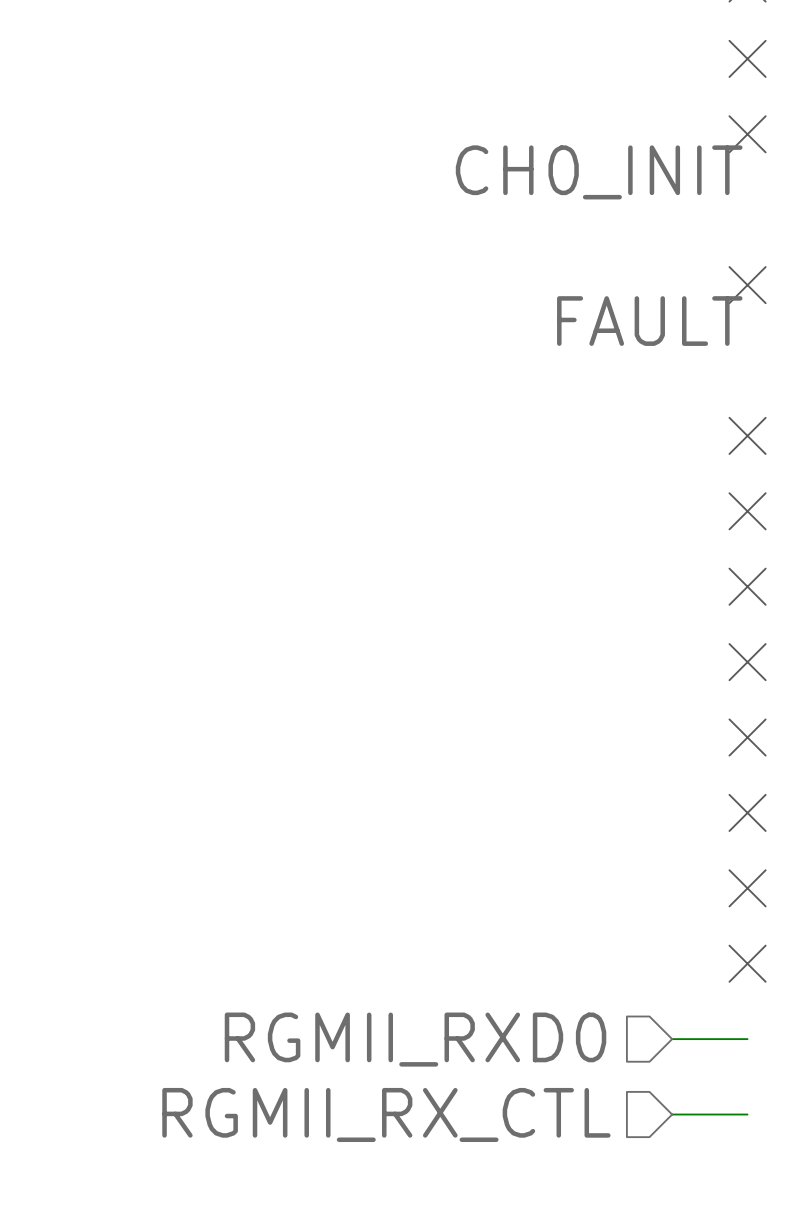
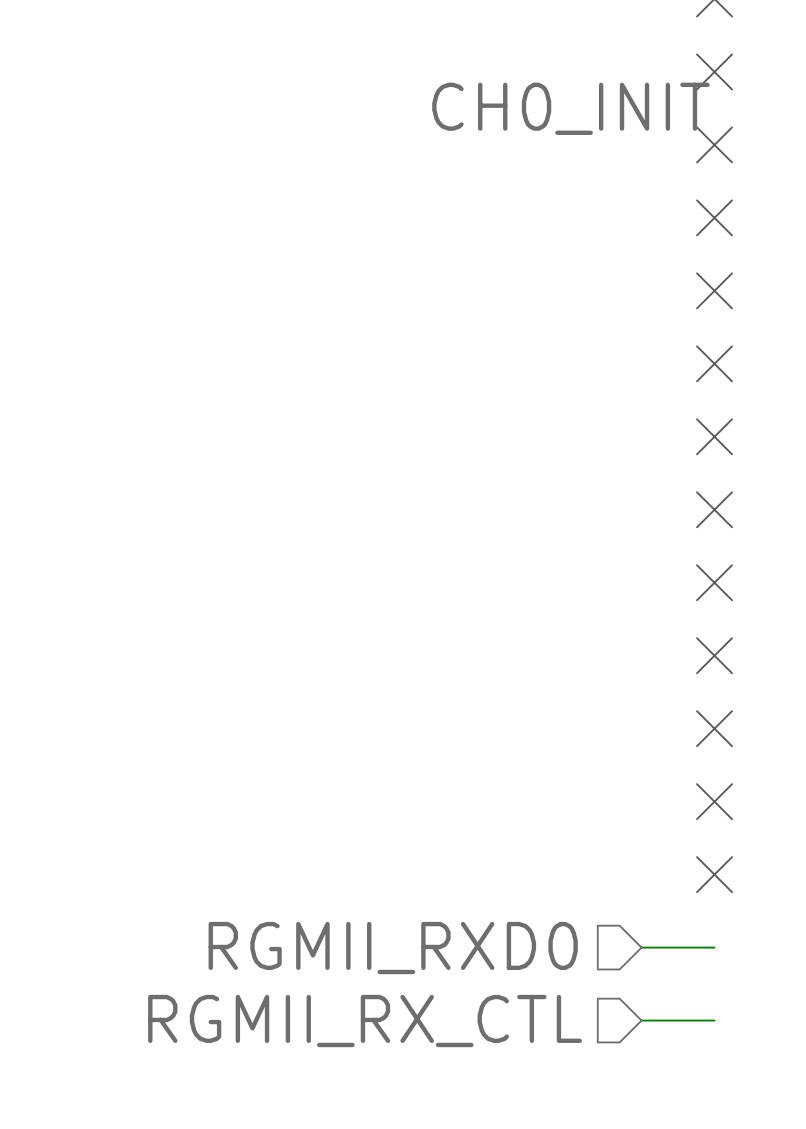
no-connect mark: none -> (714, 144)
label: FAULT (649, 321) -> none
no-connect mark: none -> (714, 290)

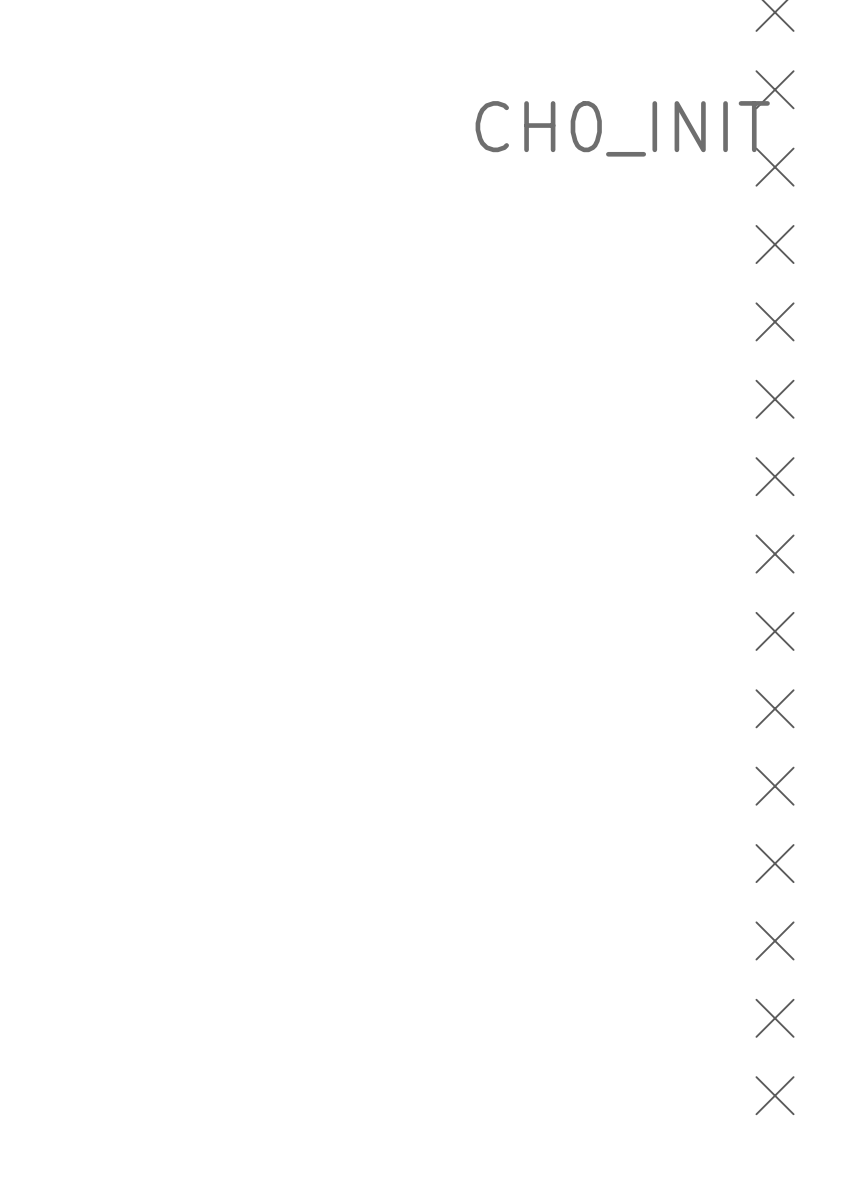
wire: (641, 947) (714, 947) -> none
no-connect mark: none -> (775, 1018)
hierarchical label: RGMII_RXD0 (393, 948) -> none
wire: (641, 1020) (714, 1020) -> none
no-connect mark: none -> (775, 1095)
hierarchical label: RGMII_RX_CTL (365, 1021) -> none

